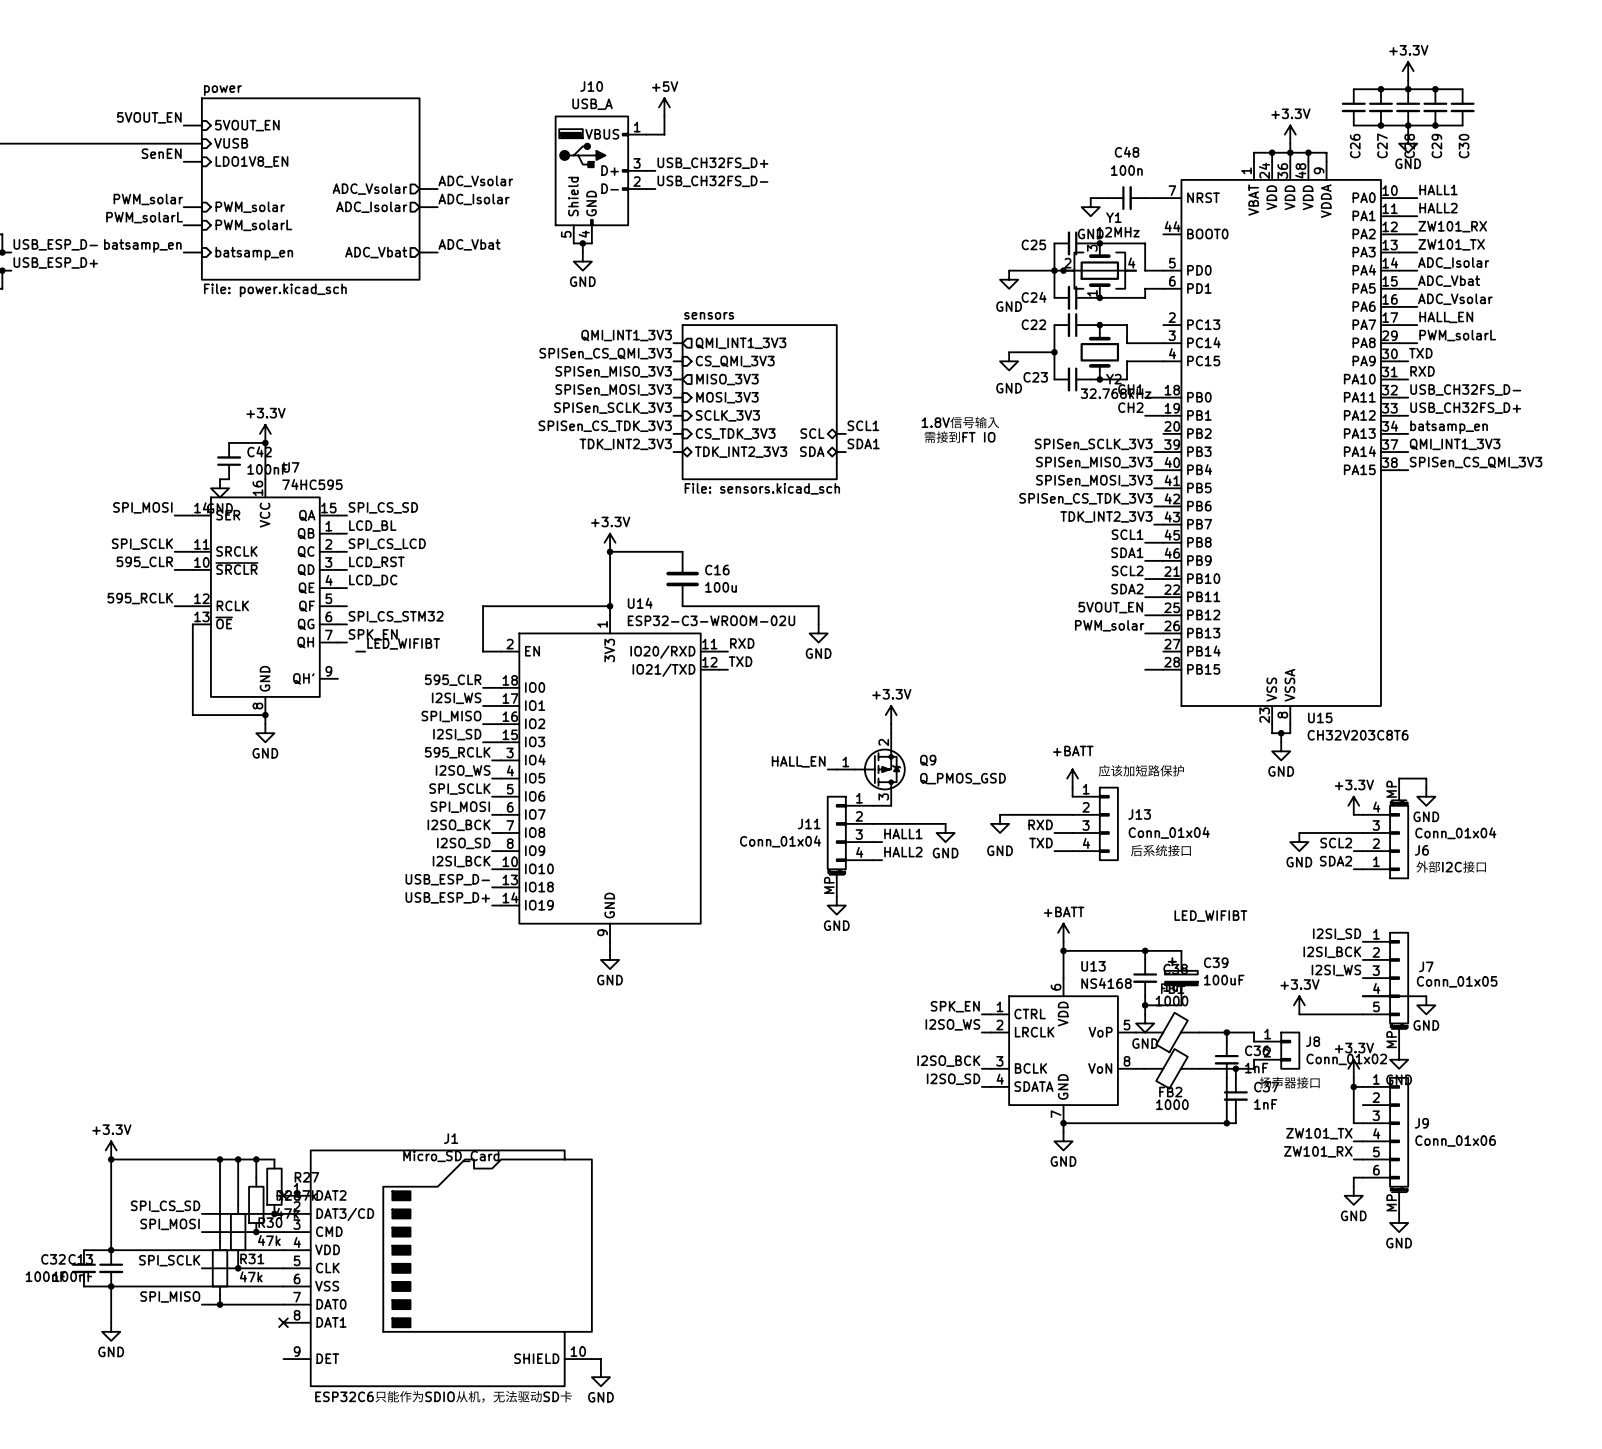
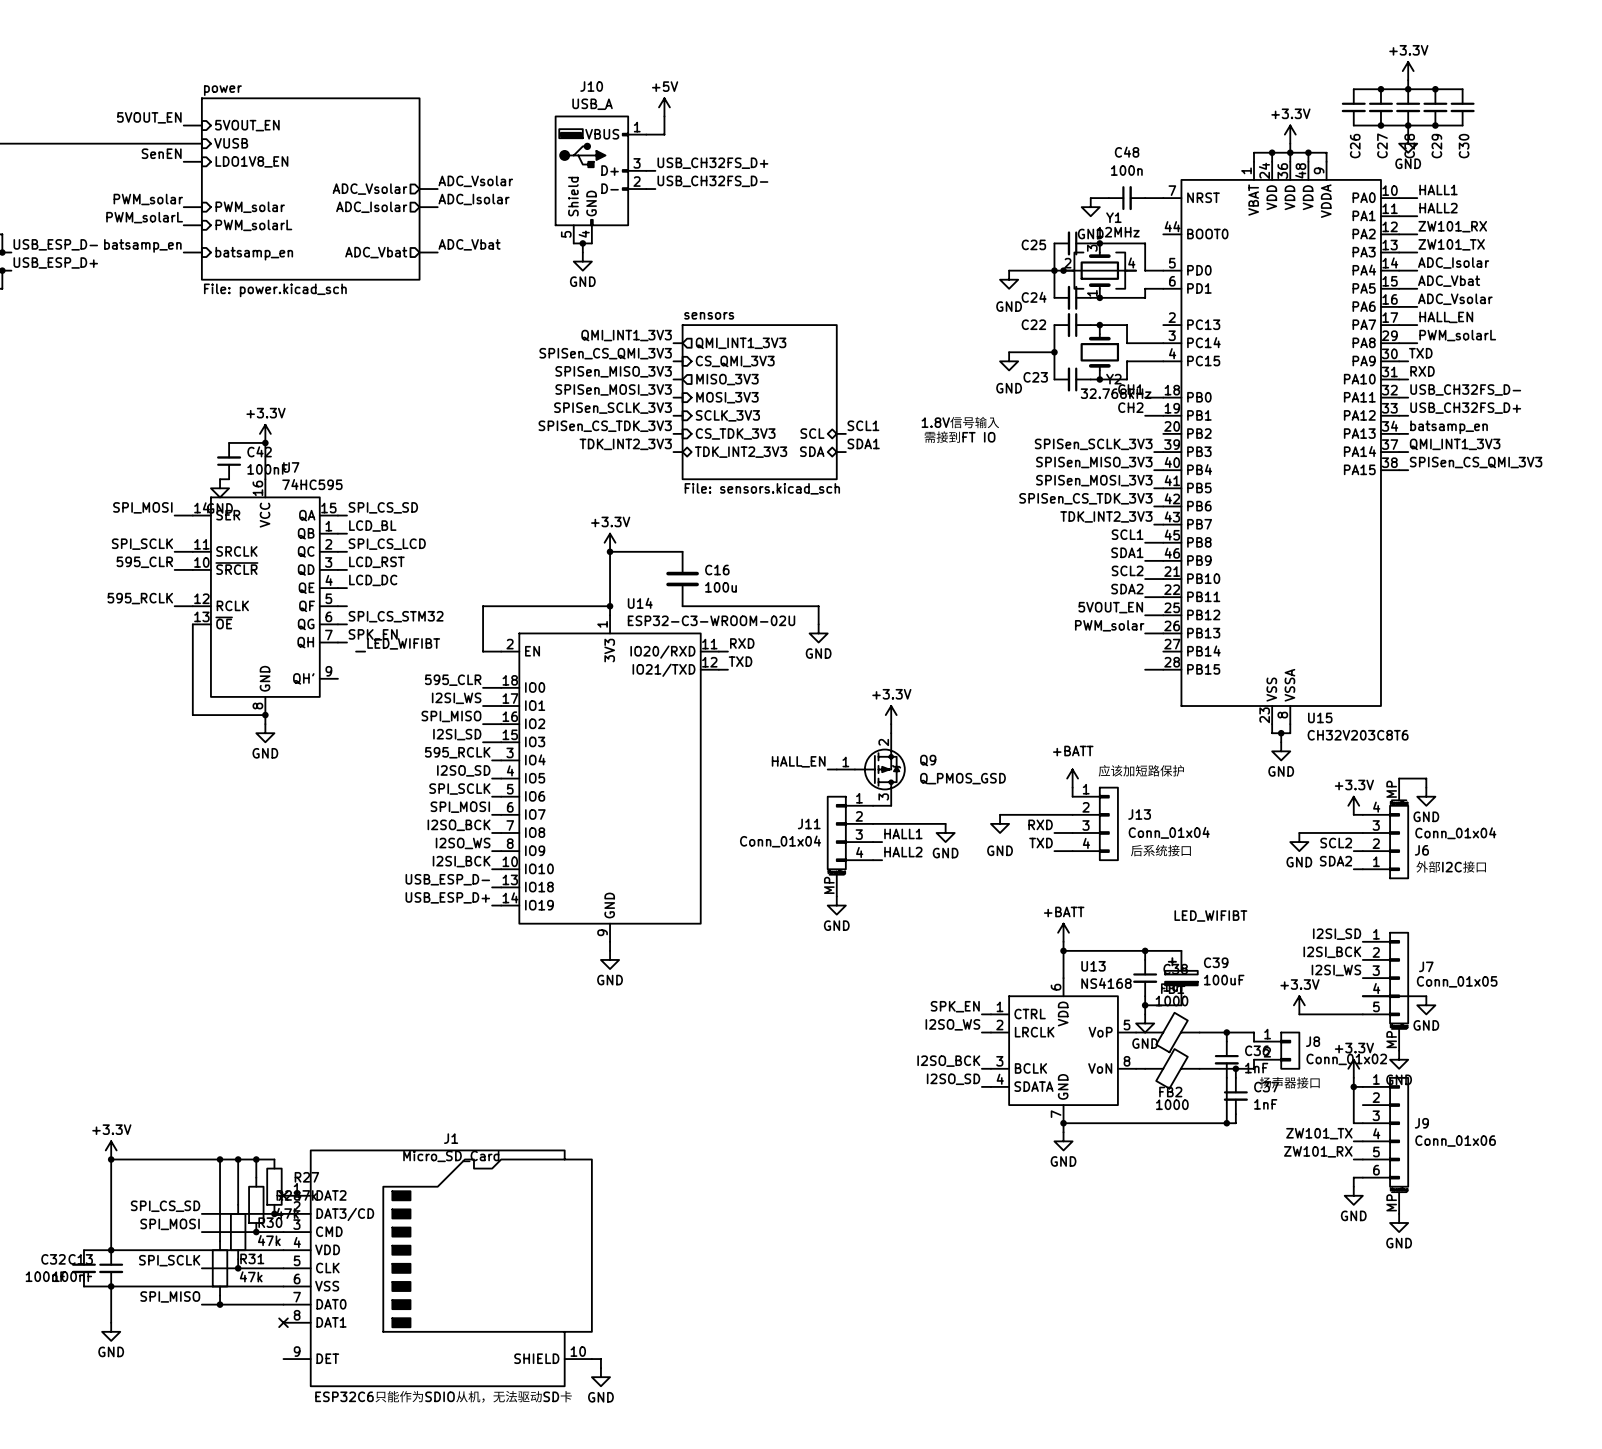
label: I2SO_WS (463, 770) -> I2SO_SD (463, 770)
label: I2SO_SD (463, 843) -> I2SO_WS (463, 843)

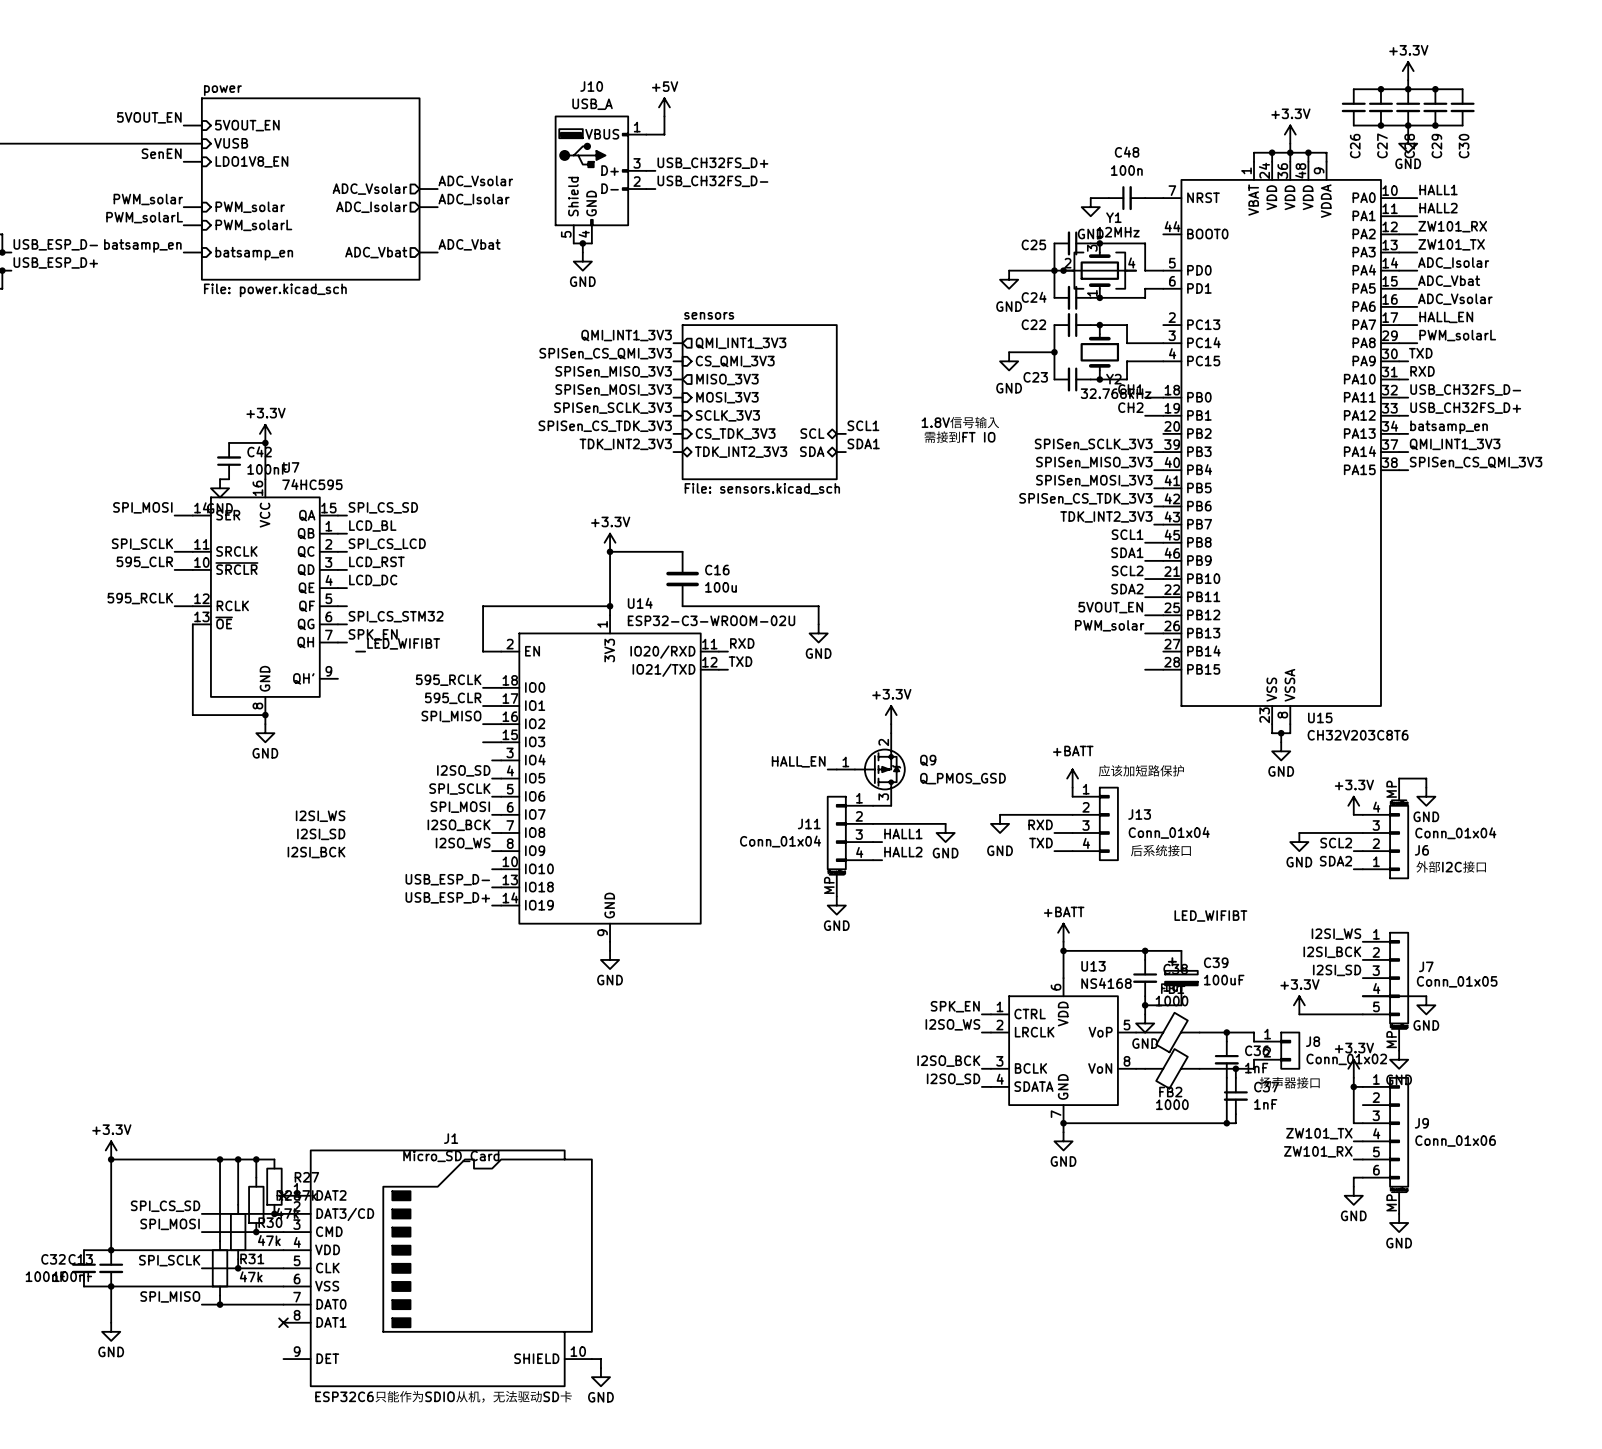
label: 595_CLR (453, 680) -> 595_RCLK (448, 680)
label: I2SI_WS (456, 698) -> 595_CLR (453, 698)
label position: I2SI_SD (457, 734) -> I2SI_SD (321, 834)
label: 595_RCLK (457, 752) -> none
label: none -> I2SI_WS (320, 816)
label position: I2SI_BCK (461, 861) -> I2SI_BCK (316, 852)
label: I2SI_SD (1337, 934) -> I2SI_WS (1336, 934)
label: I2SI_WS (1336, 970) -> I2SI_SD (1337, 970)

